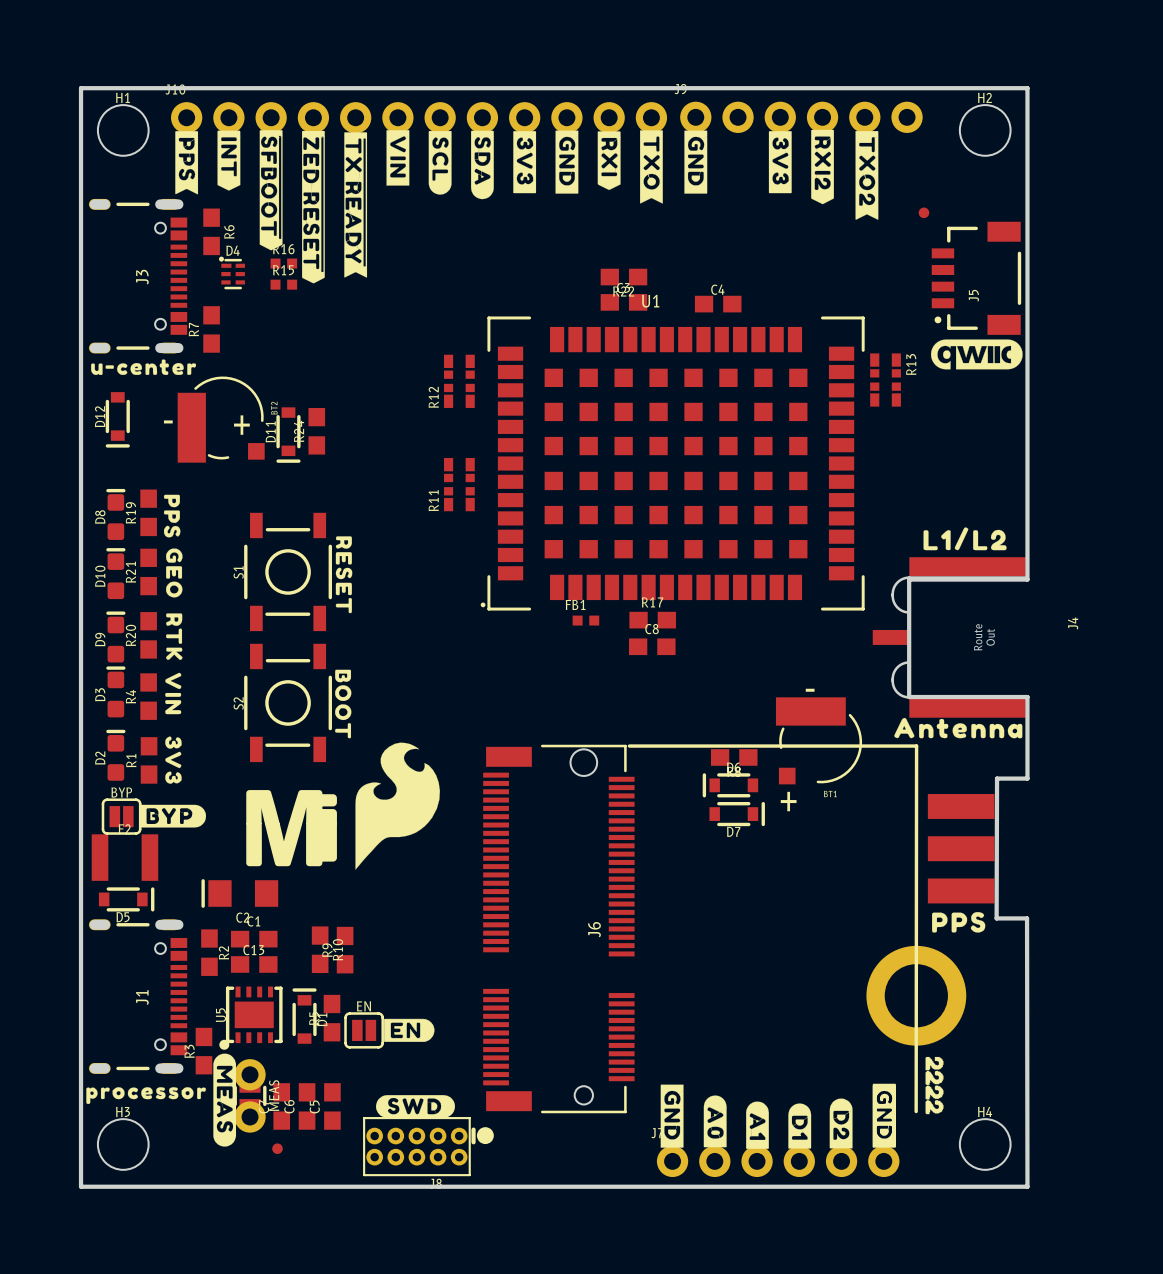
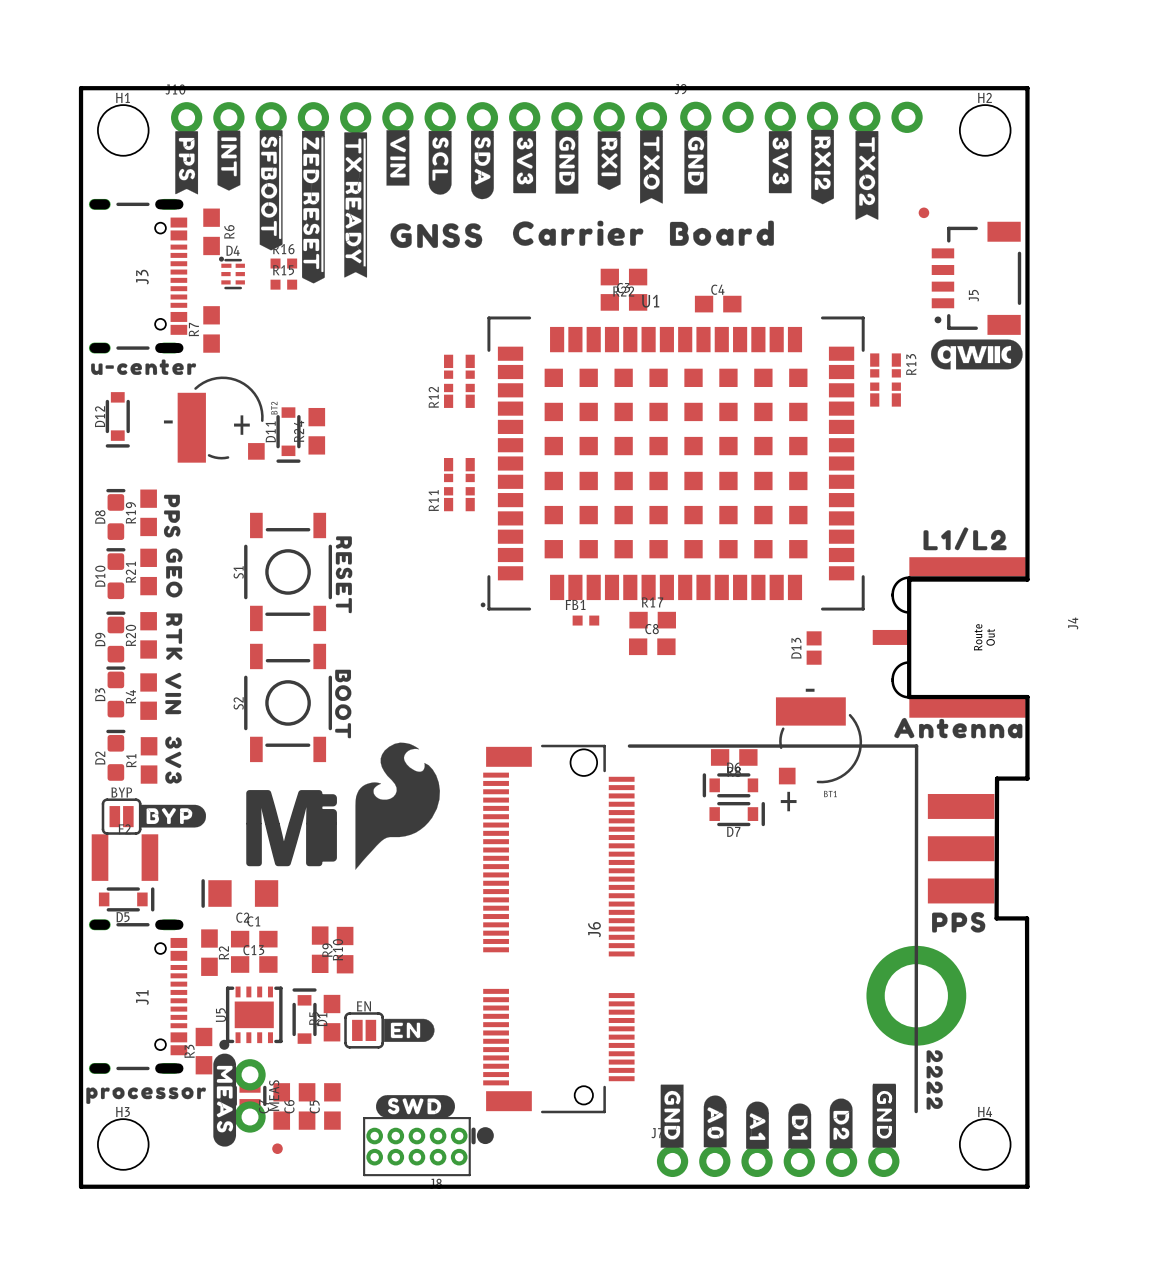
drawing: none -> [512, 220, 644, 246]
drawing: none -> [669, 220, 774, 246]
drawing: none -> [390, 223, 483, 248]
D13: none -> (814, 648)
J6 footprint: [483, 744, 635, 1114] -> [483, 744, 635, 1114]
drawing shape: [925, 1056, 944, 1115] -> [926, 1050, 943, 1110]

